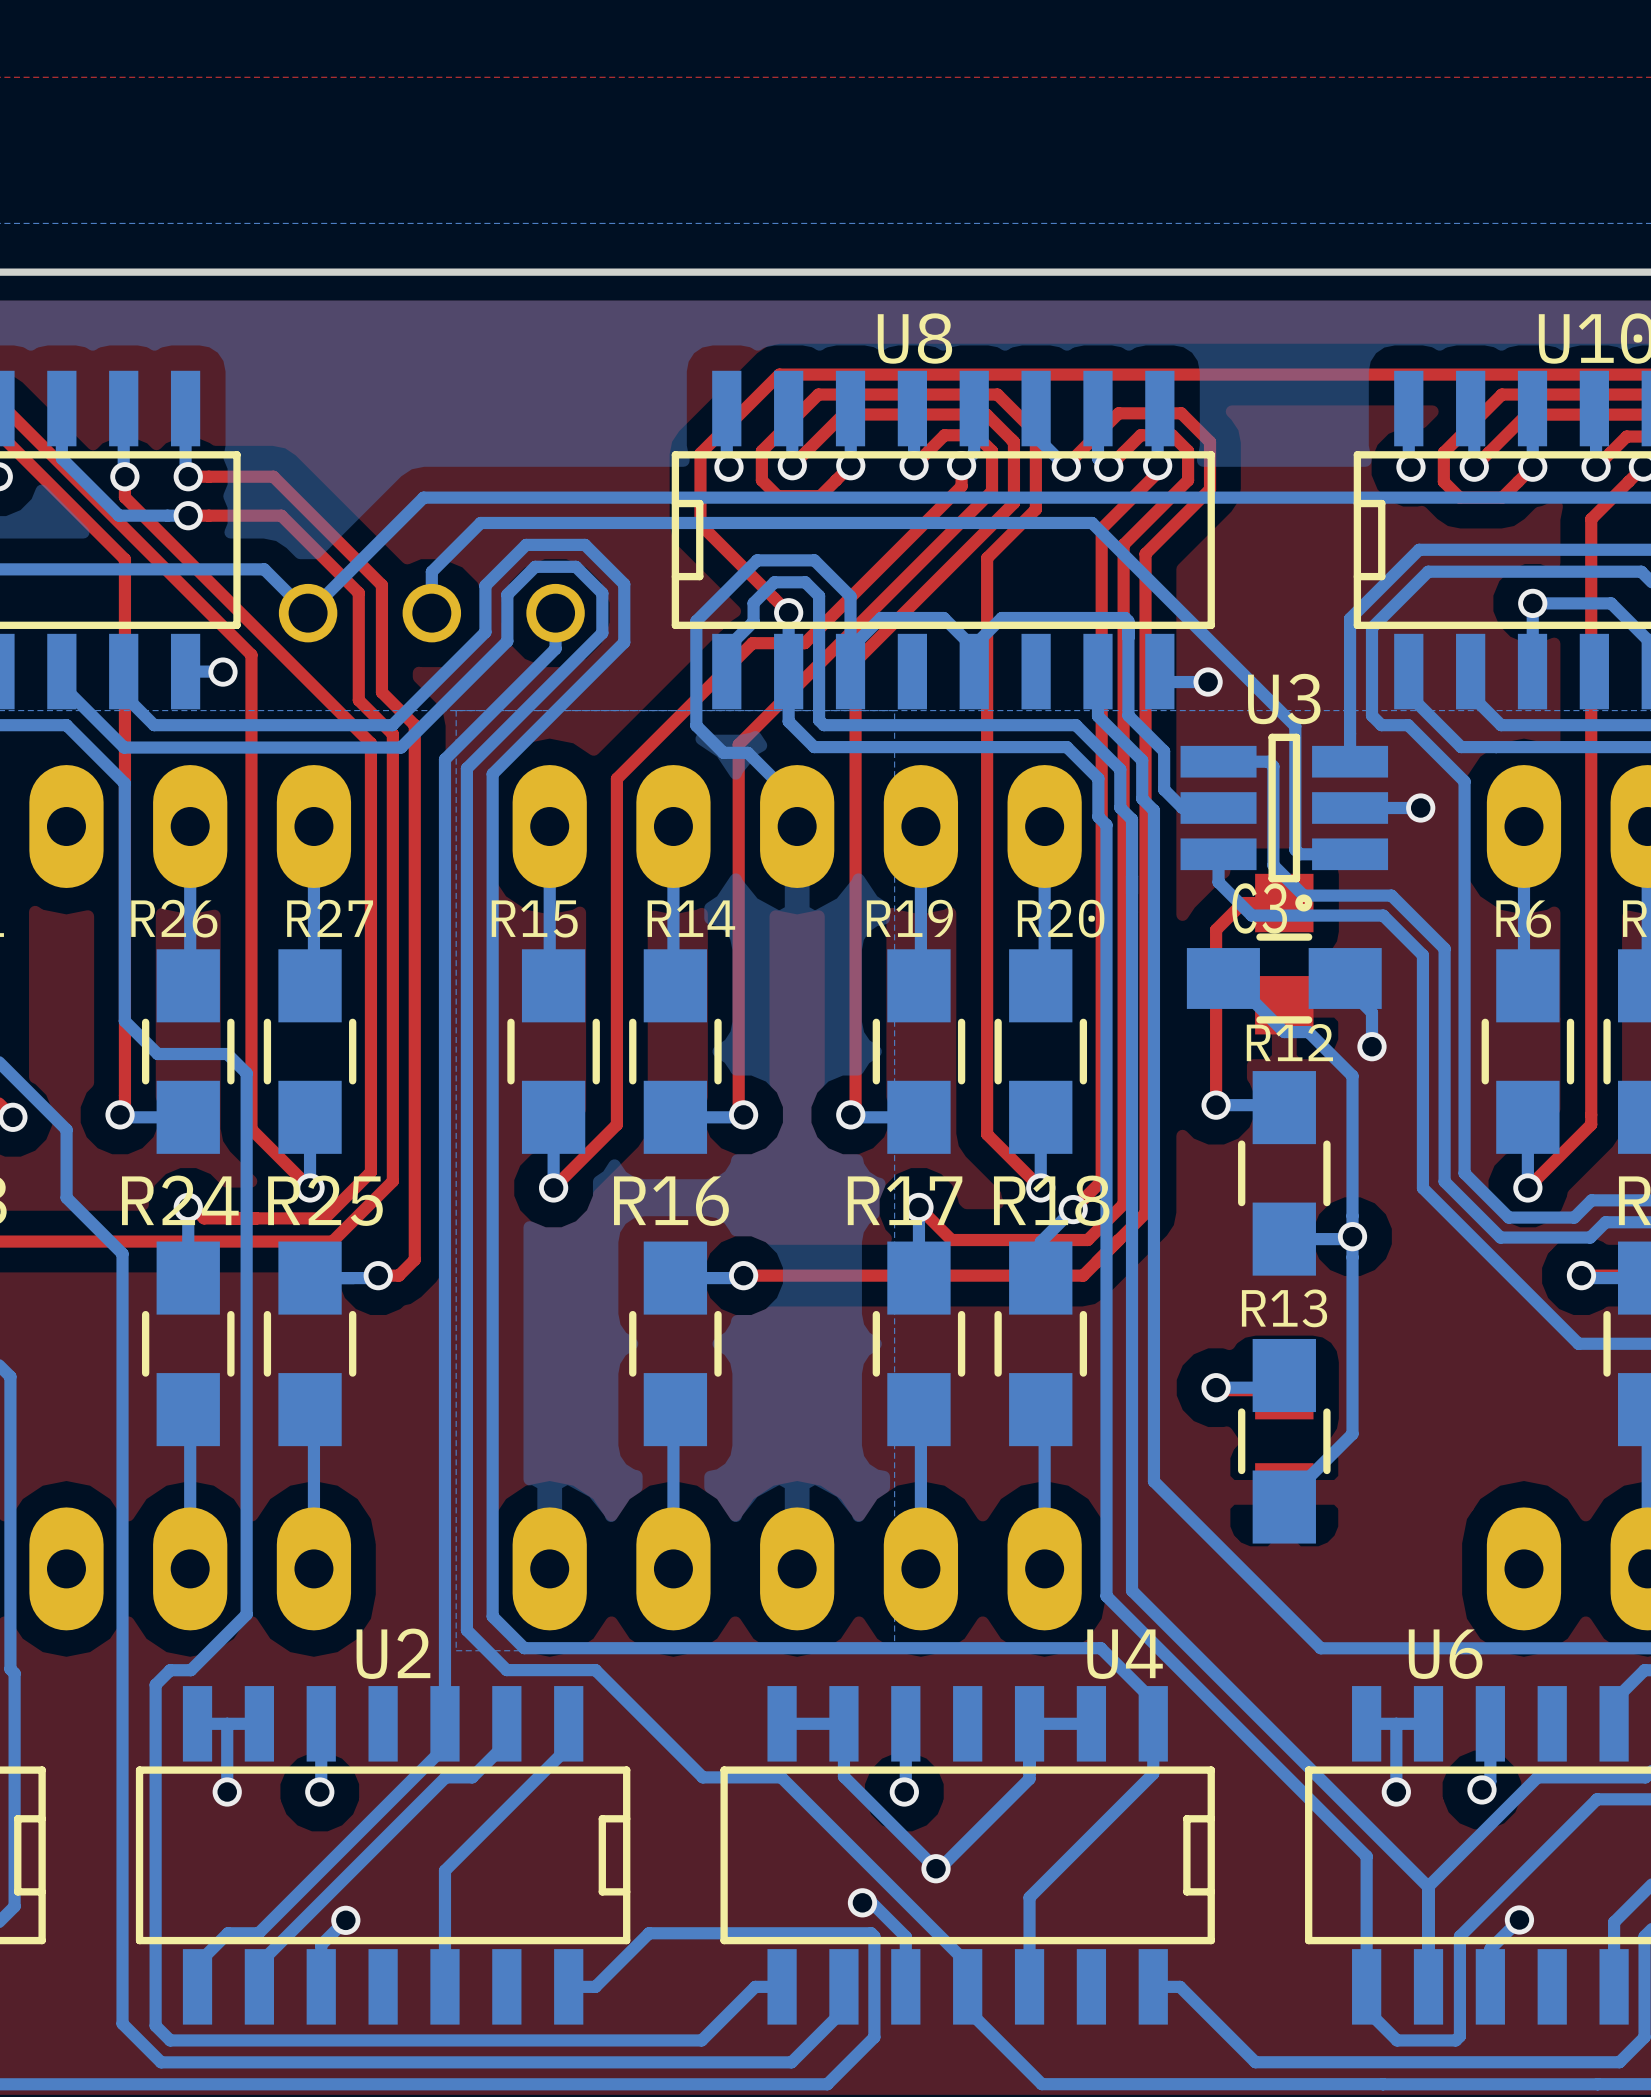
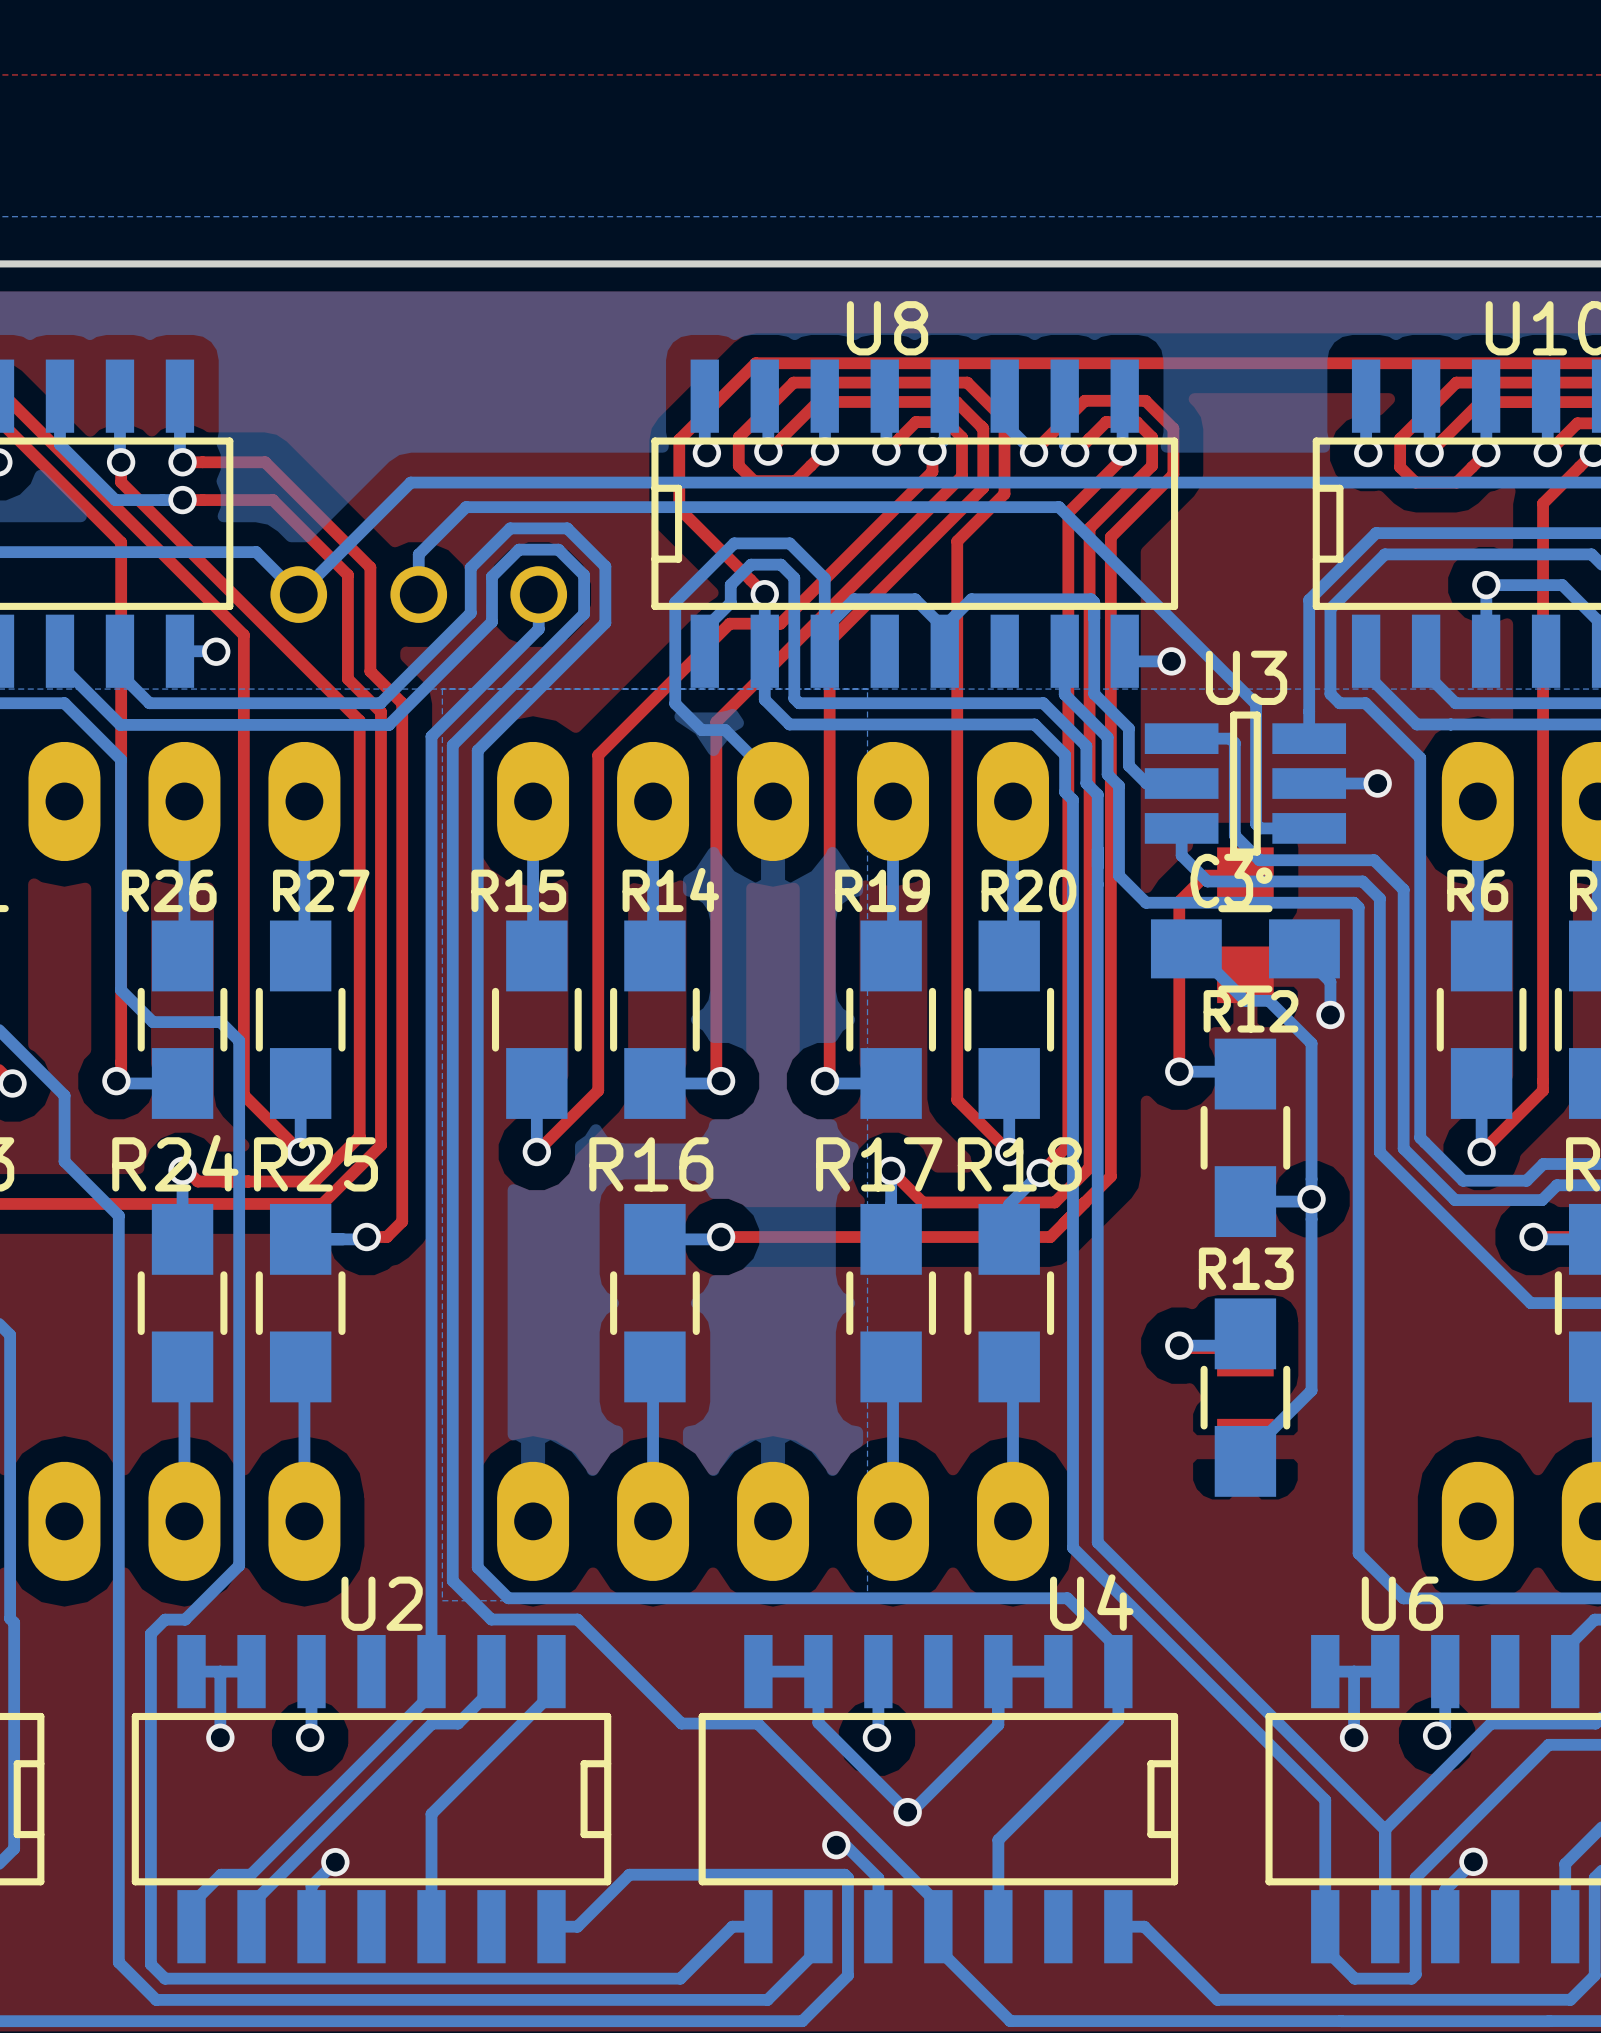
bottom track: (1273, 861) (1273, 865) (1303, 895) (1391, 895) (1405, 909) -> none
bottom track: (1153, 902) (1153, 1481) (1320, 1648) (1447, 1648) -> (1118, 875) (1146, 902) (1353, 902) (1358, 907) (1358, 1553) (1403, 1598)
bottom track: (1245, 909) (1251, 915) (1383, 915) (1422, 955) -> (1207, 881) (1362, 881)
bottom track: (1422, 926) (1444, 948) (1444, 1181) (1447, 1184) -> (1234, 835) (1259, 860) (1374, 860) (1403, 889) (1403, 1148)
bottom track: none -> (1379, 898) (1379, 926)

